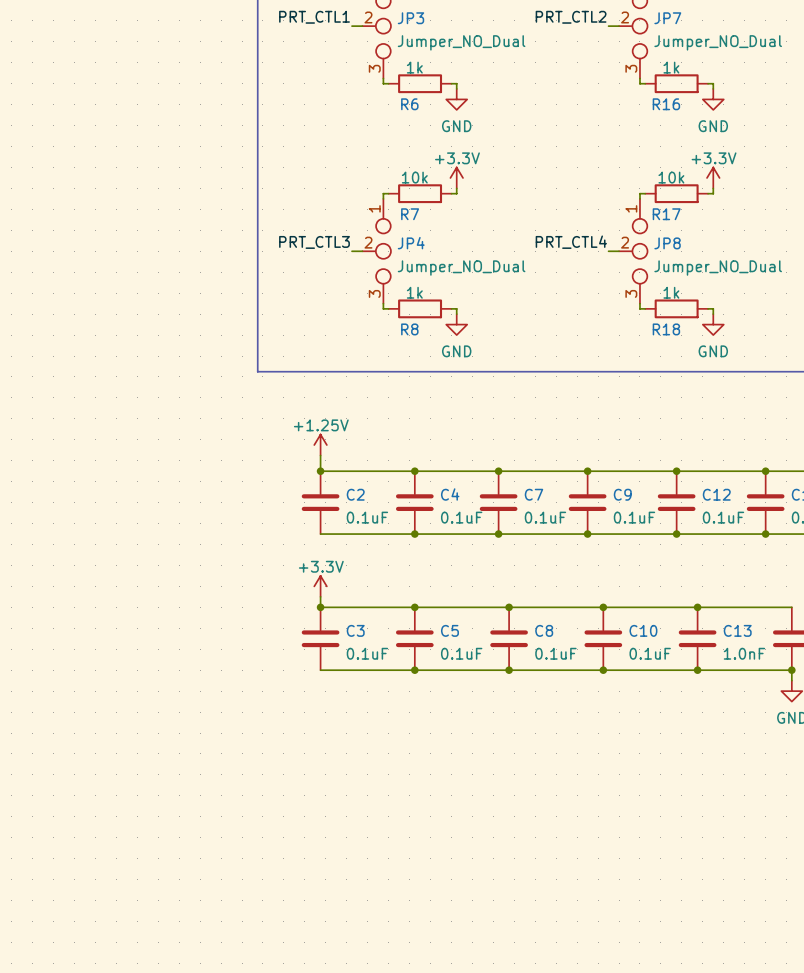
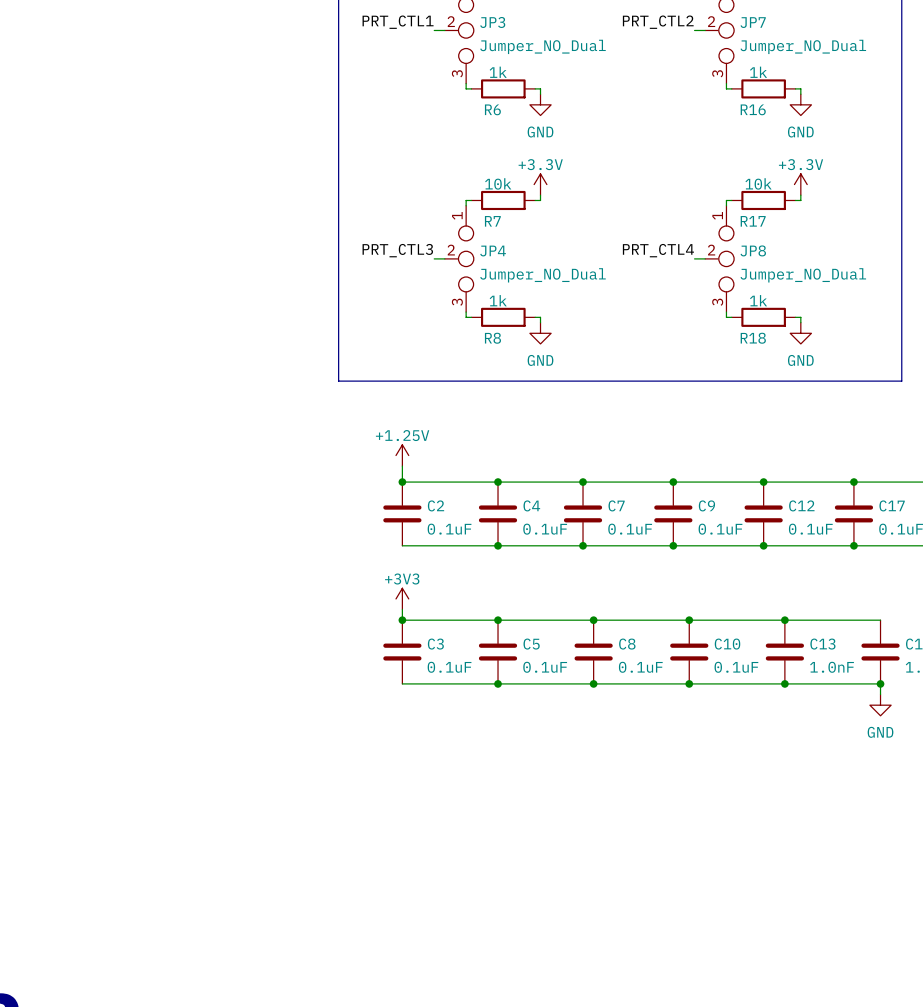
power symbol: +3.3V (320, 586) -> +3V3 (402, 598)

